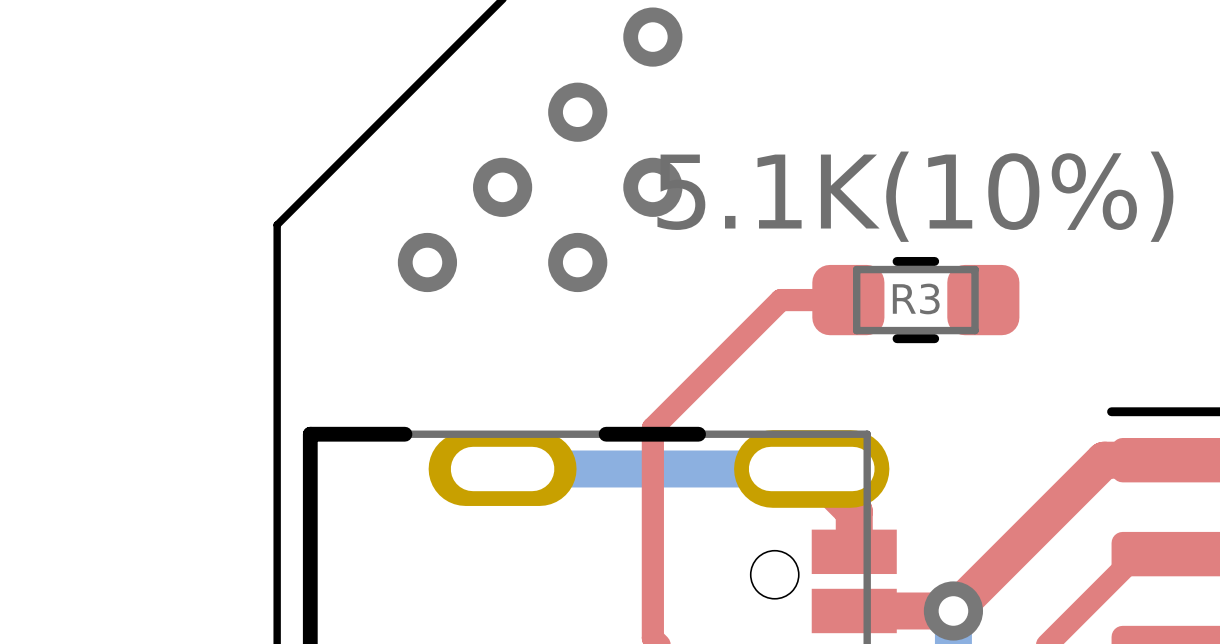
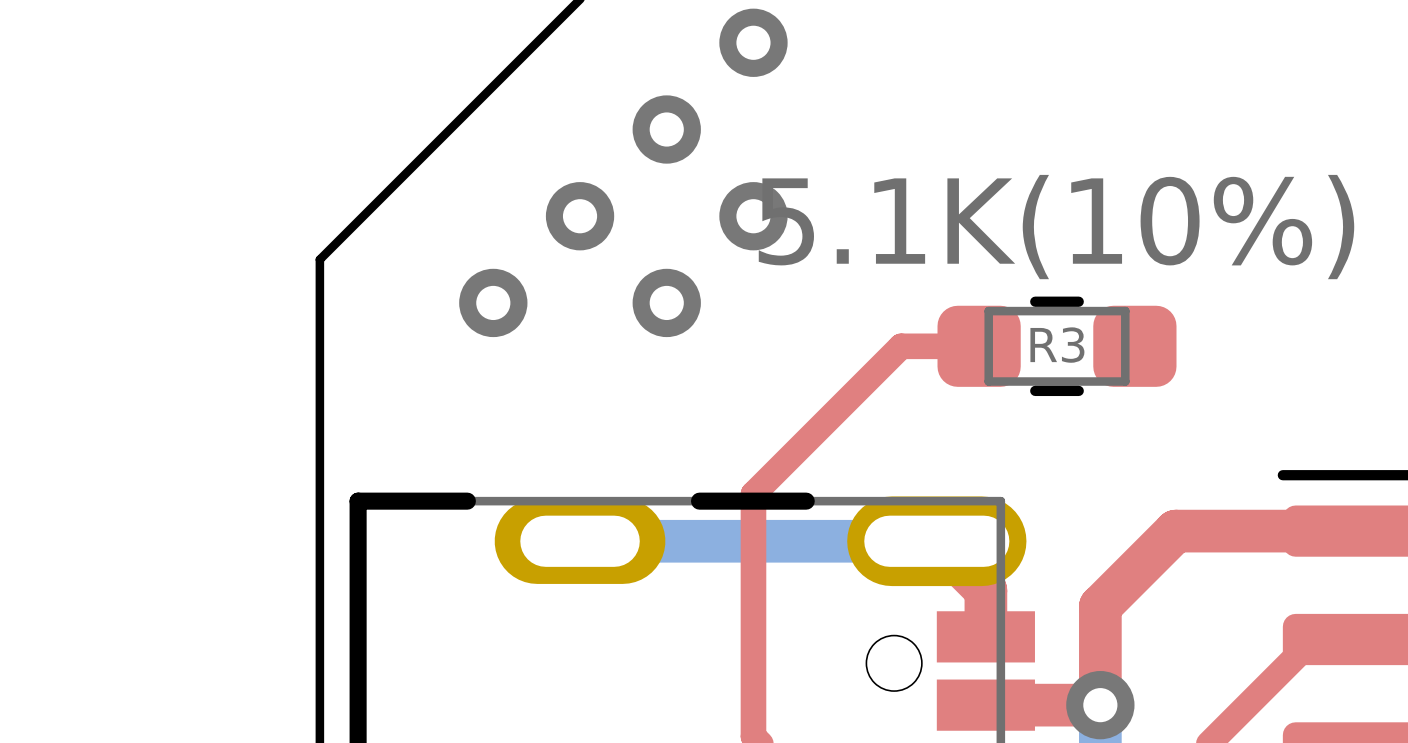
top track: (1104, 460) (953, 610) -> (1274, 531) (1175, 531) (1100, 606) (1100, 705)

